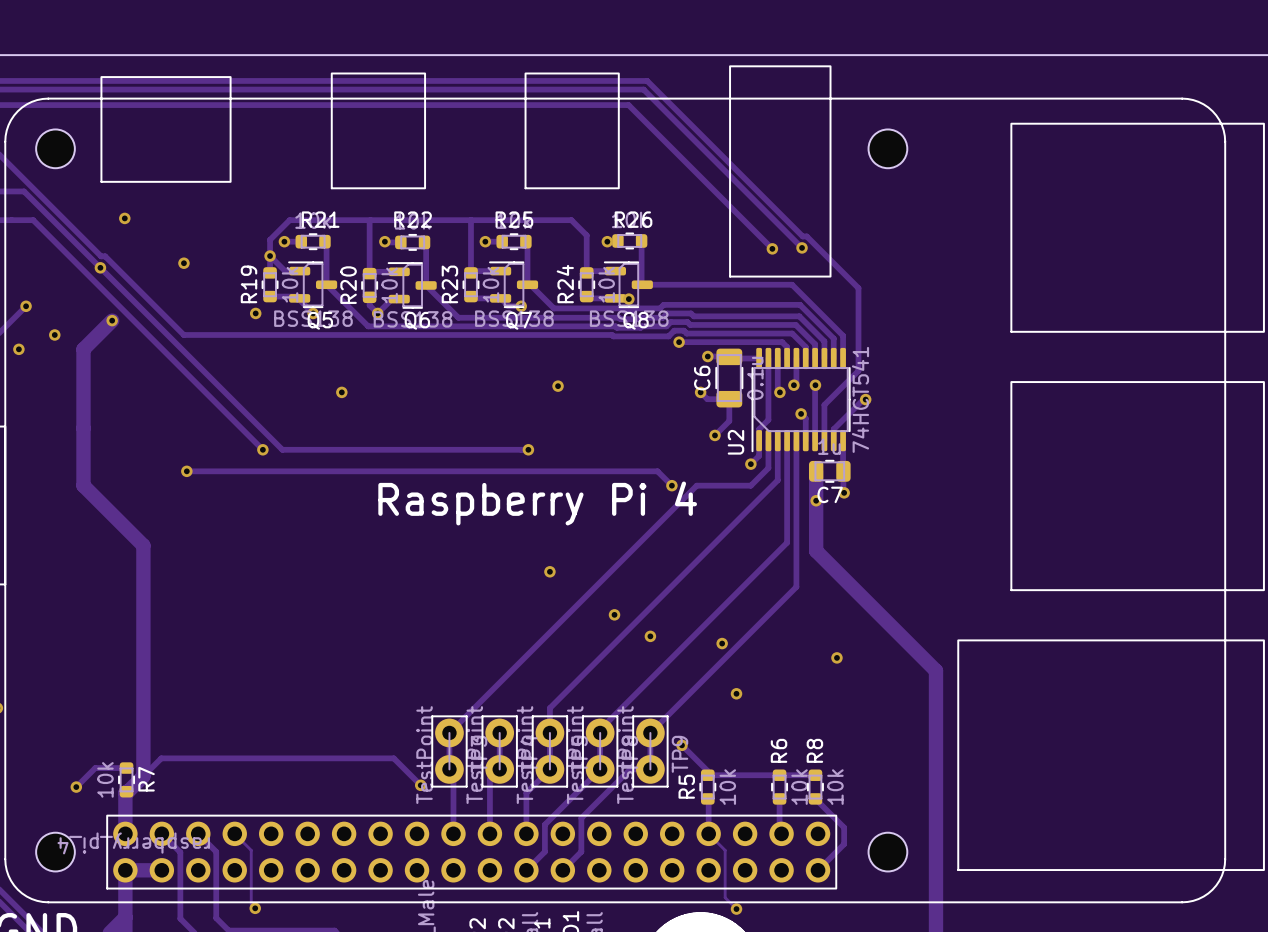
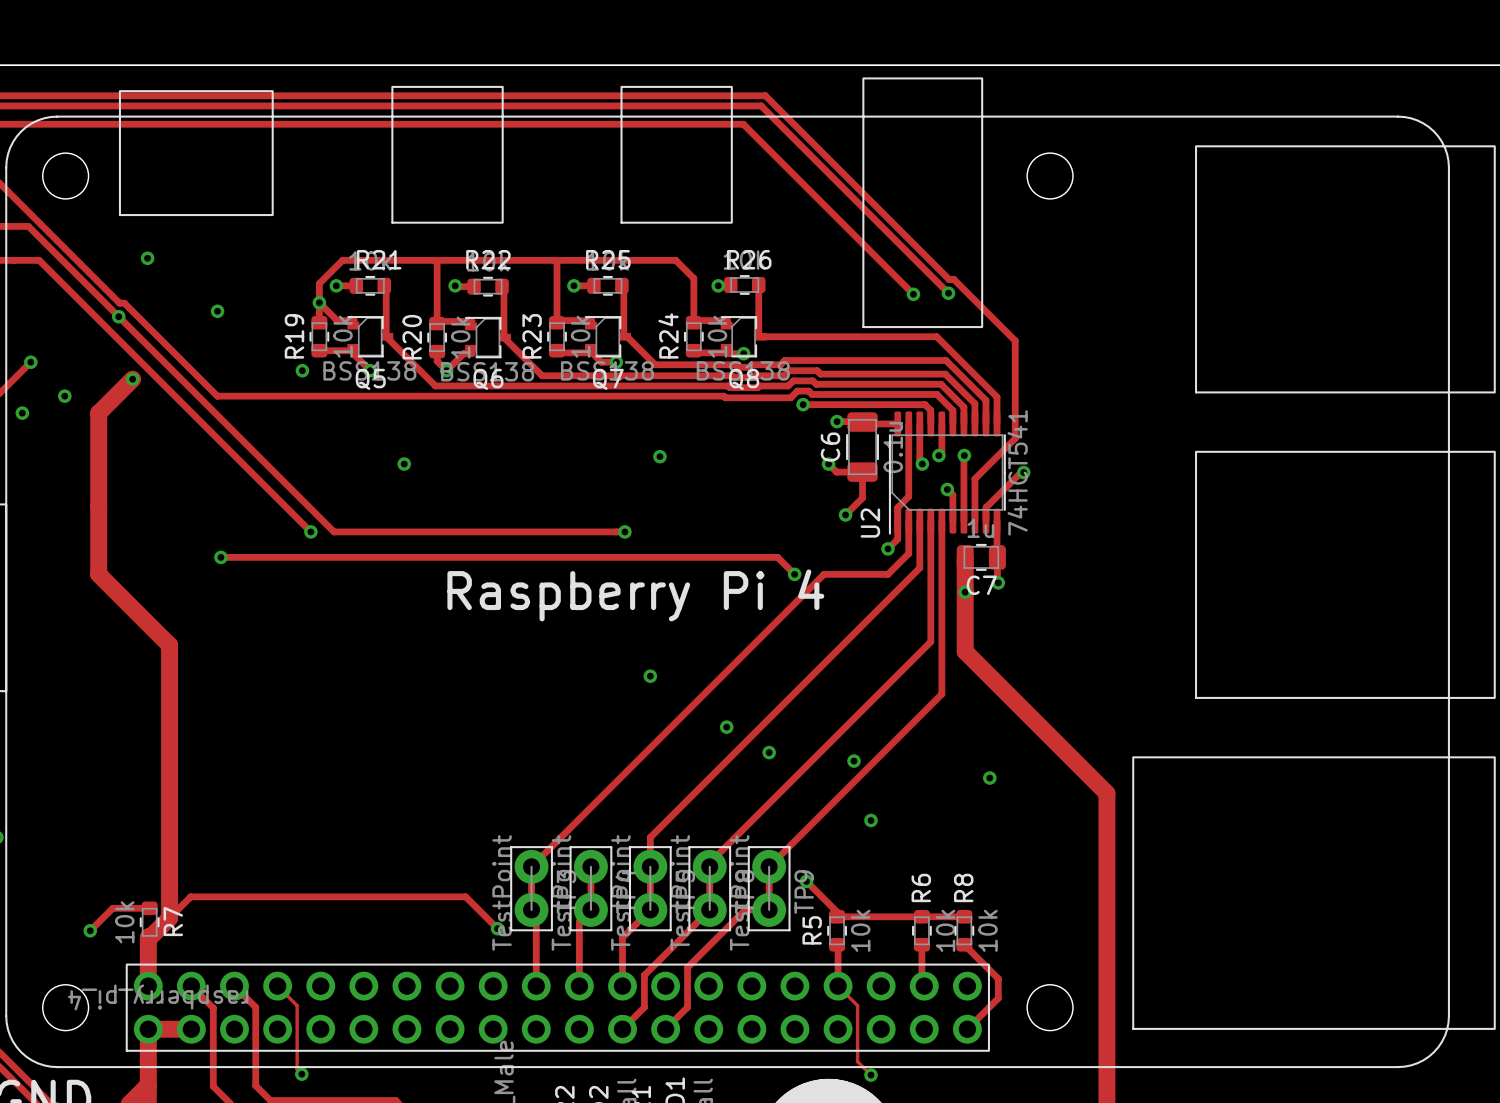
Q5 footprint: [288, 261, 338, 309] -> [347, 316, 394, 358]
Q7 footprint: [489, 261, 539, 309] -> [584, 316, 631, 358]
Q8 footprint: [603, 261, 653, 309] -> [720, 316, 767, 358]
Q6 footprint: [387, 262, 437, 309] -> [464, 316, 511, 359]

